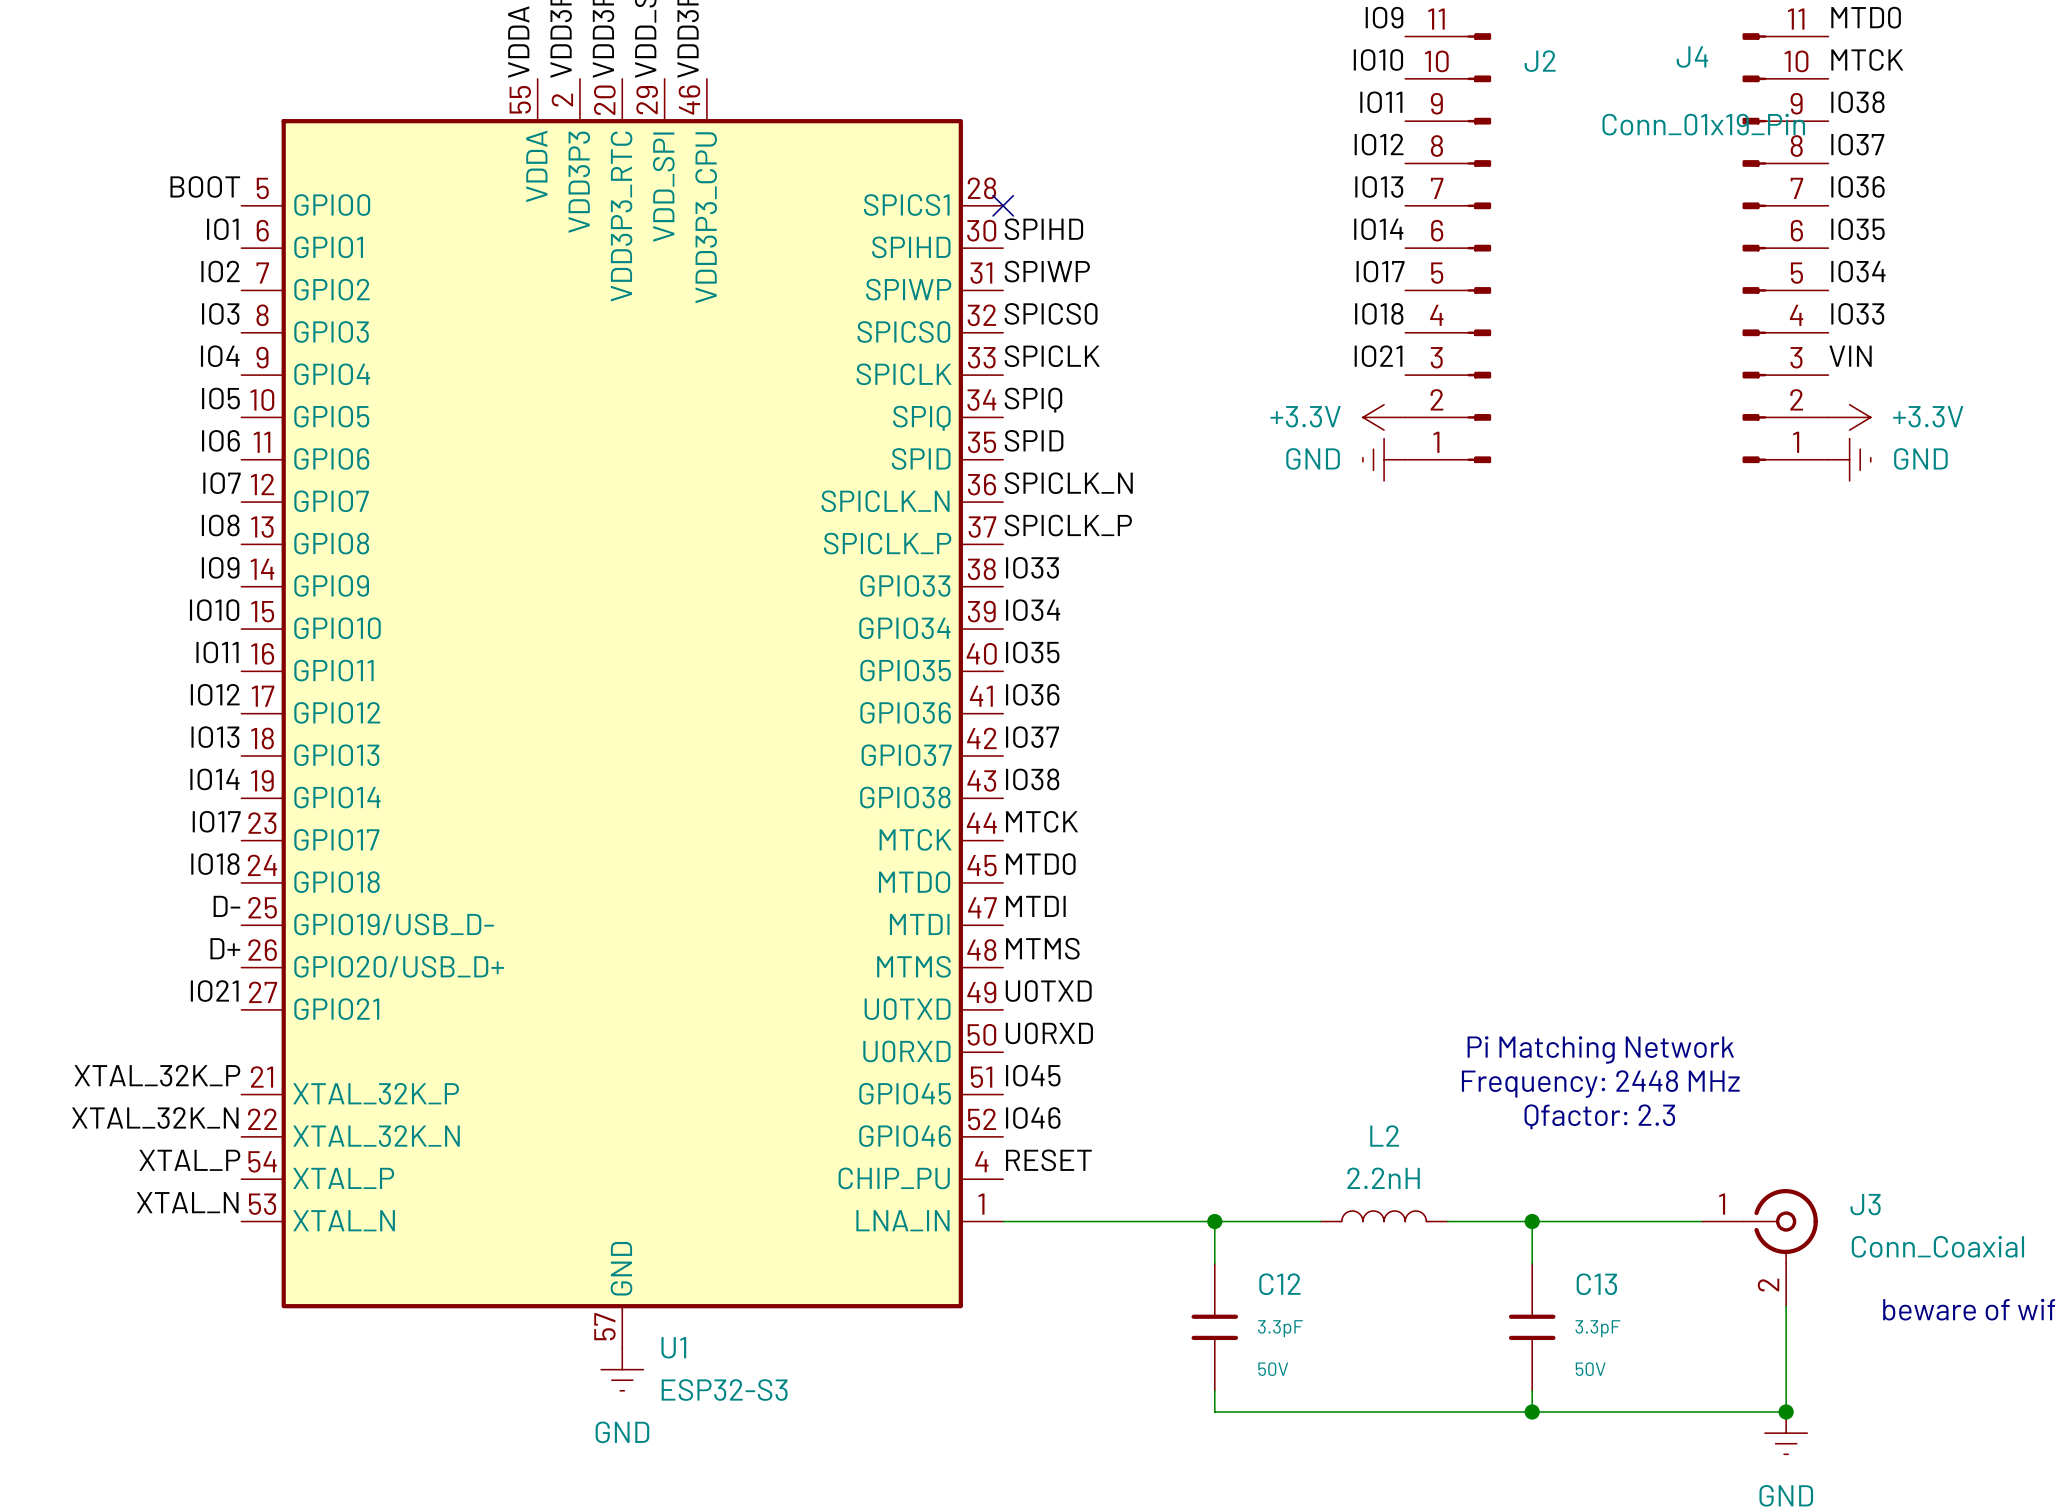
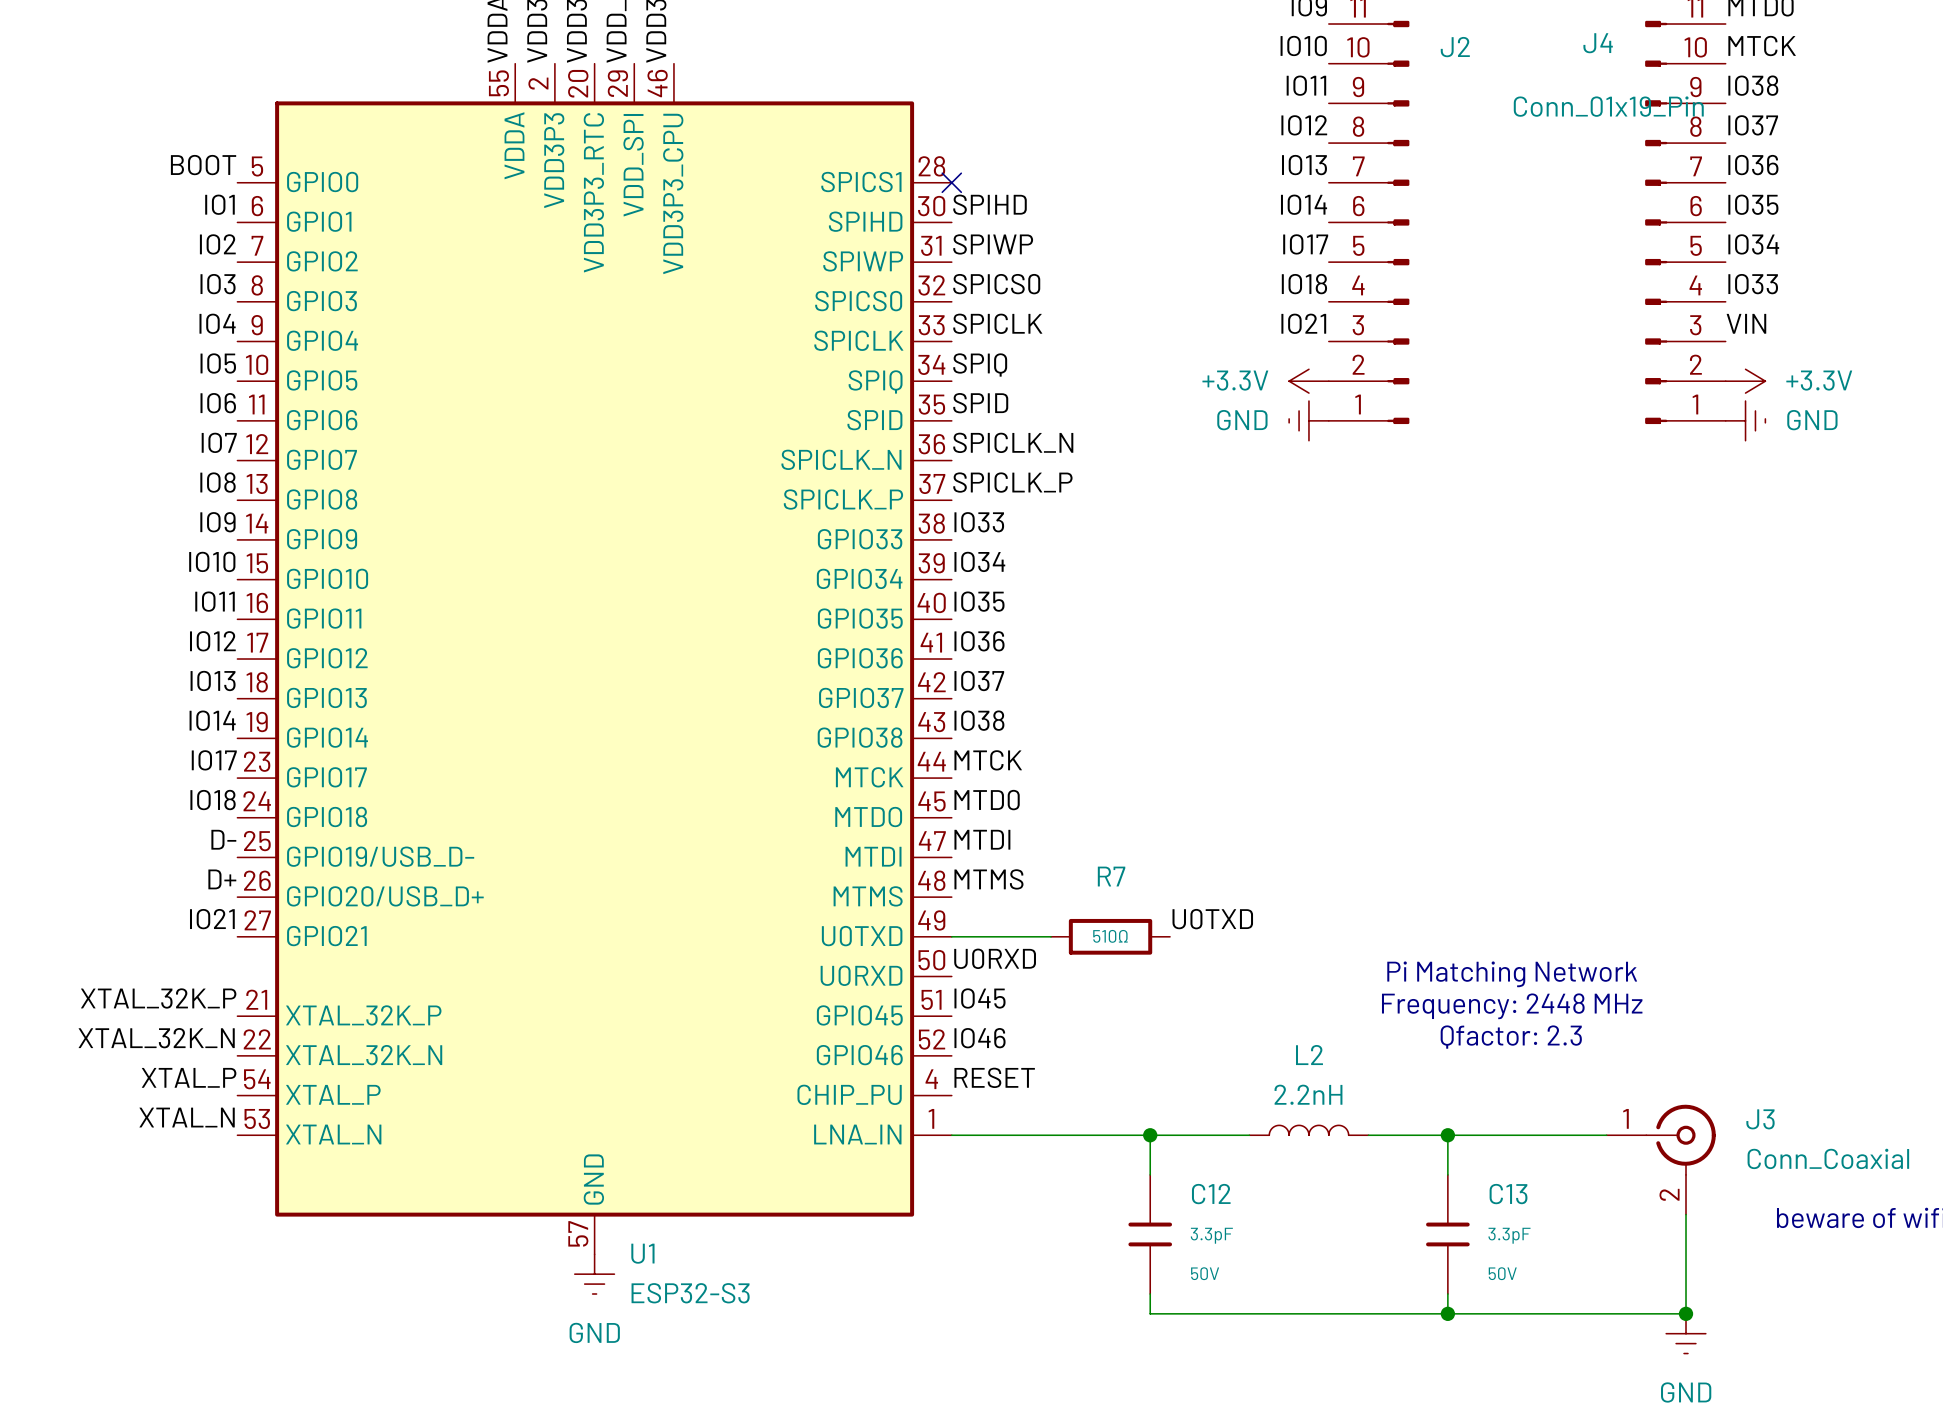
label position: U0TXD (1048, 991) -> U0TXD (1212, 919)
wire: none -> (951, 936) (1051, 936)
R7: none -> 510Ω (1110, 936)

